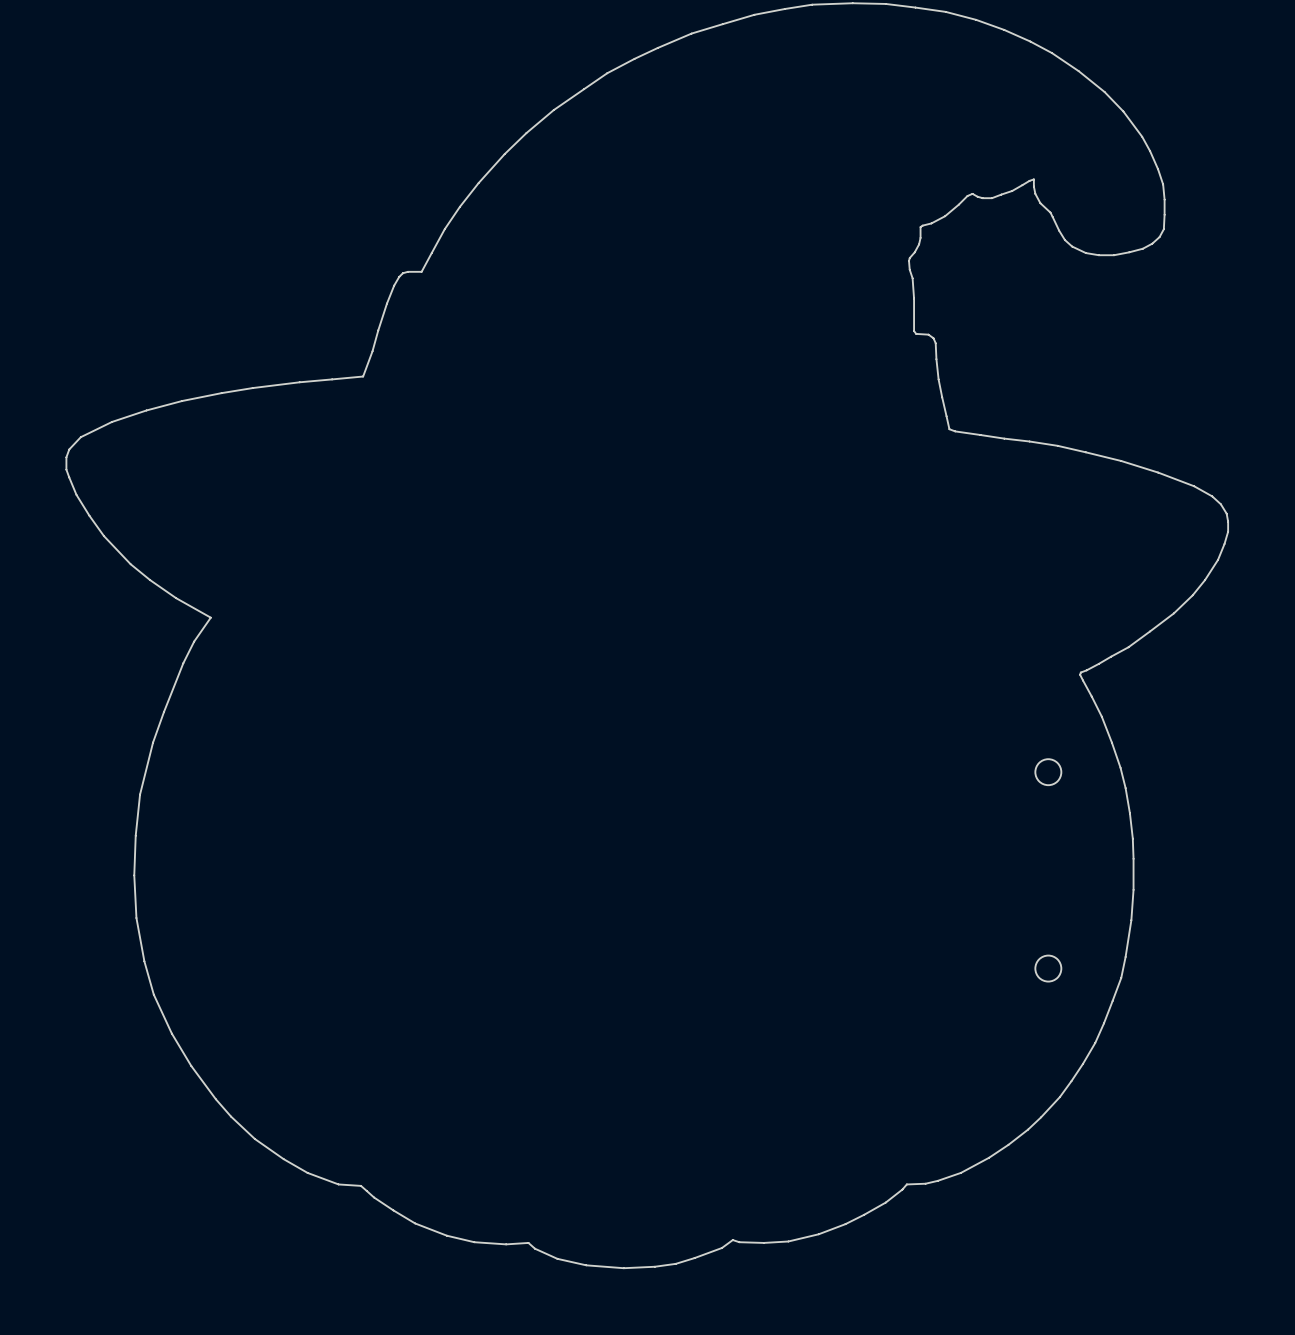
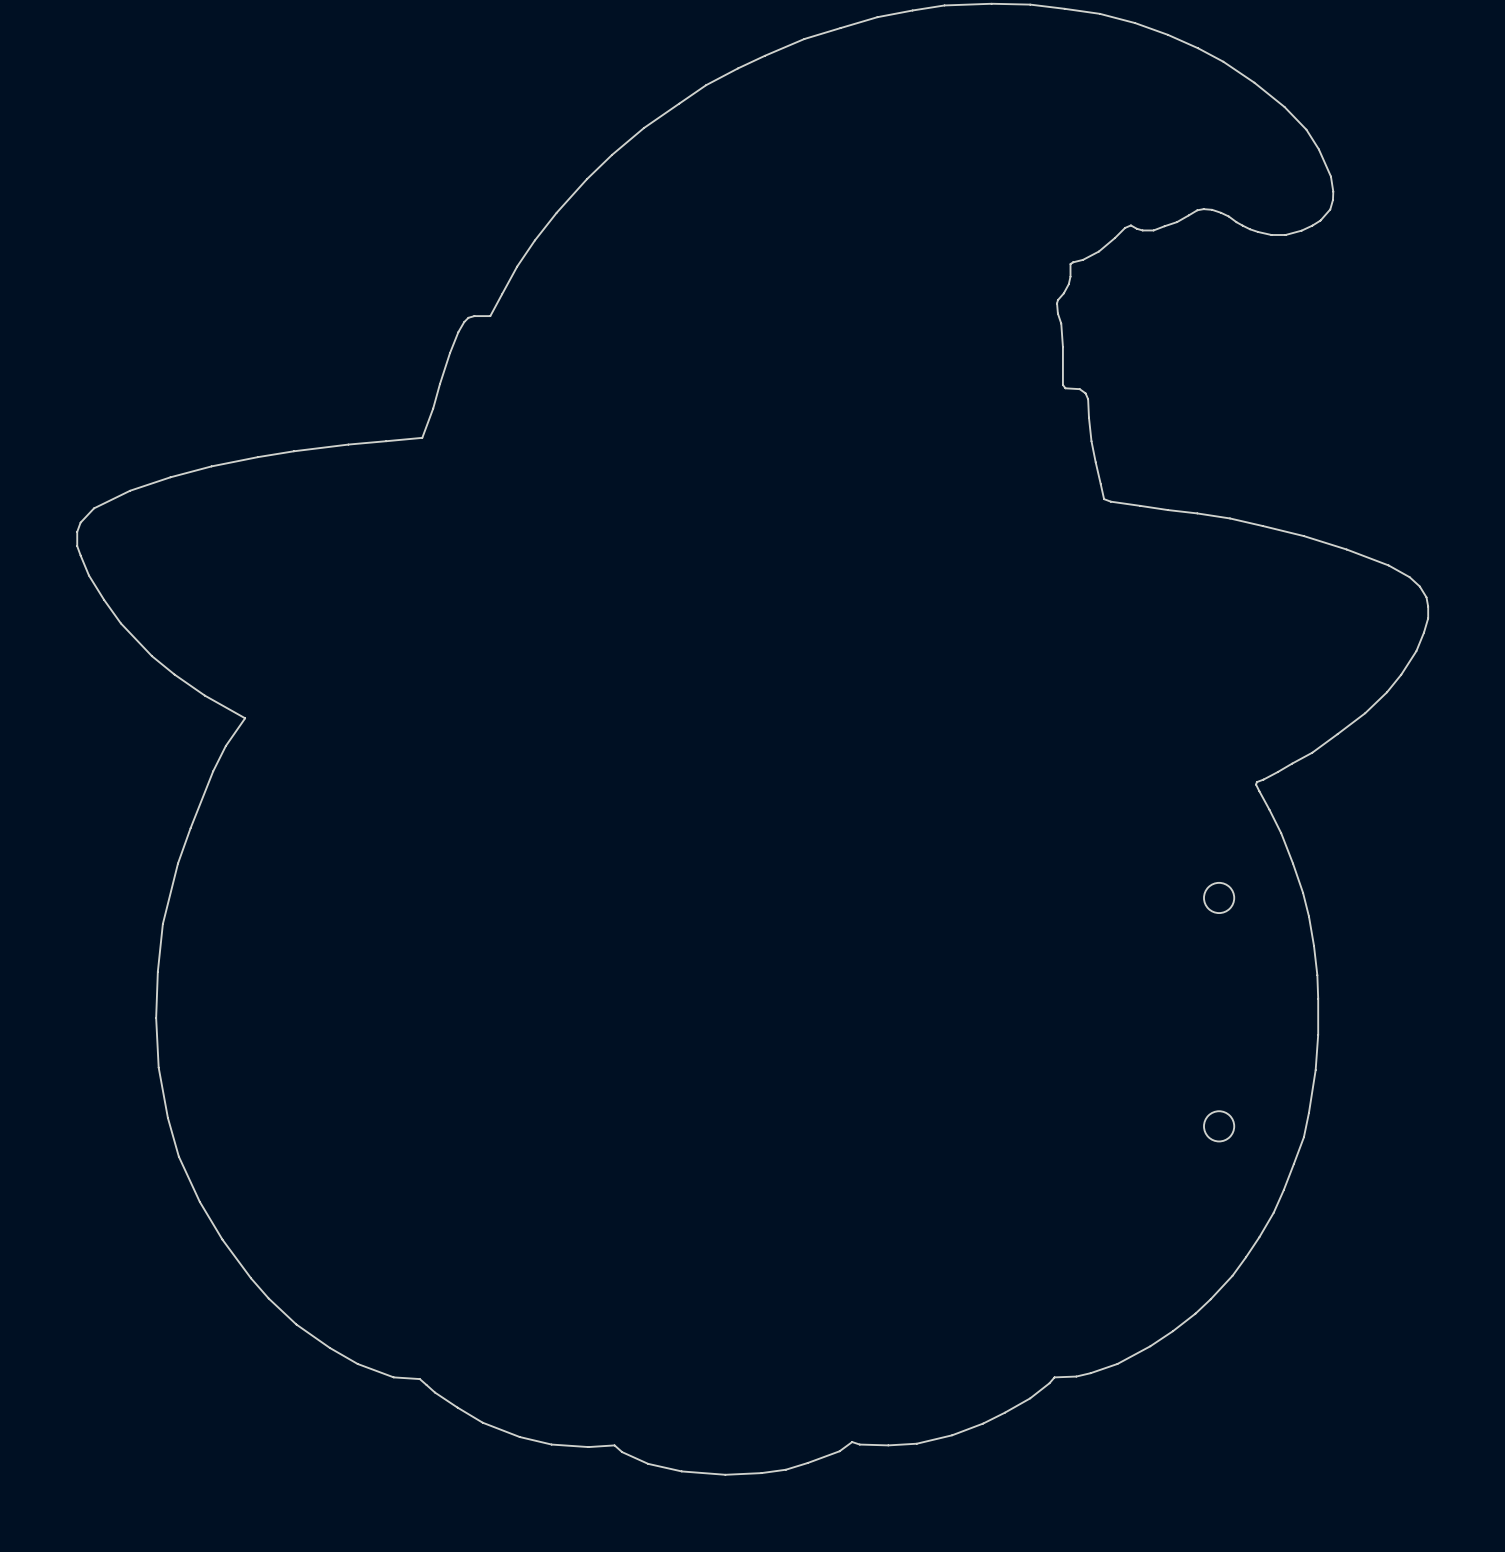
board edge: (1123, 111) (1150, 151) (1163, 184) (1163, 229) (1159, 237) (1152, 243) (1142, 248) (1114, 255) (1085, 253) (1072, 246) (1064, 240) (1050, 212) (1040, 203) (1035, 193) (1033, 179) (1029, 180) -> (1306, 129) (1318, 149) (1330, 176) (1333, 191) (1330, 209) (1320, 220) (1301, 230) (1285, 235) (1271, 235) (1250, 229) (1228, 216) (1212, 209) (1197, 210)

